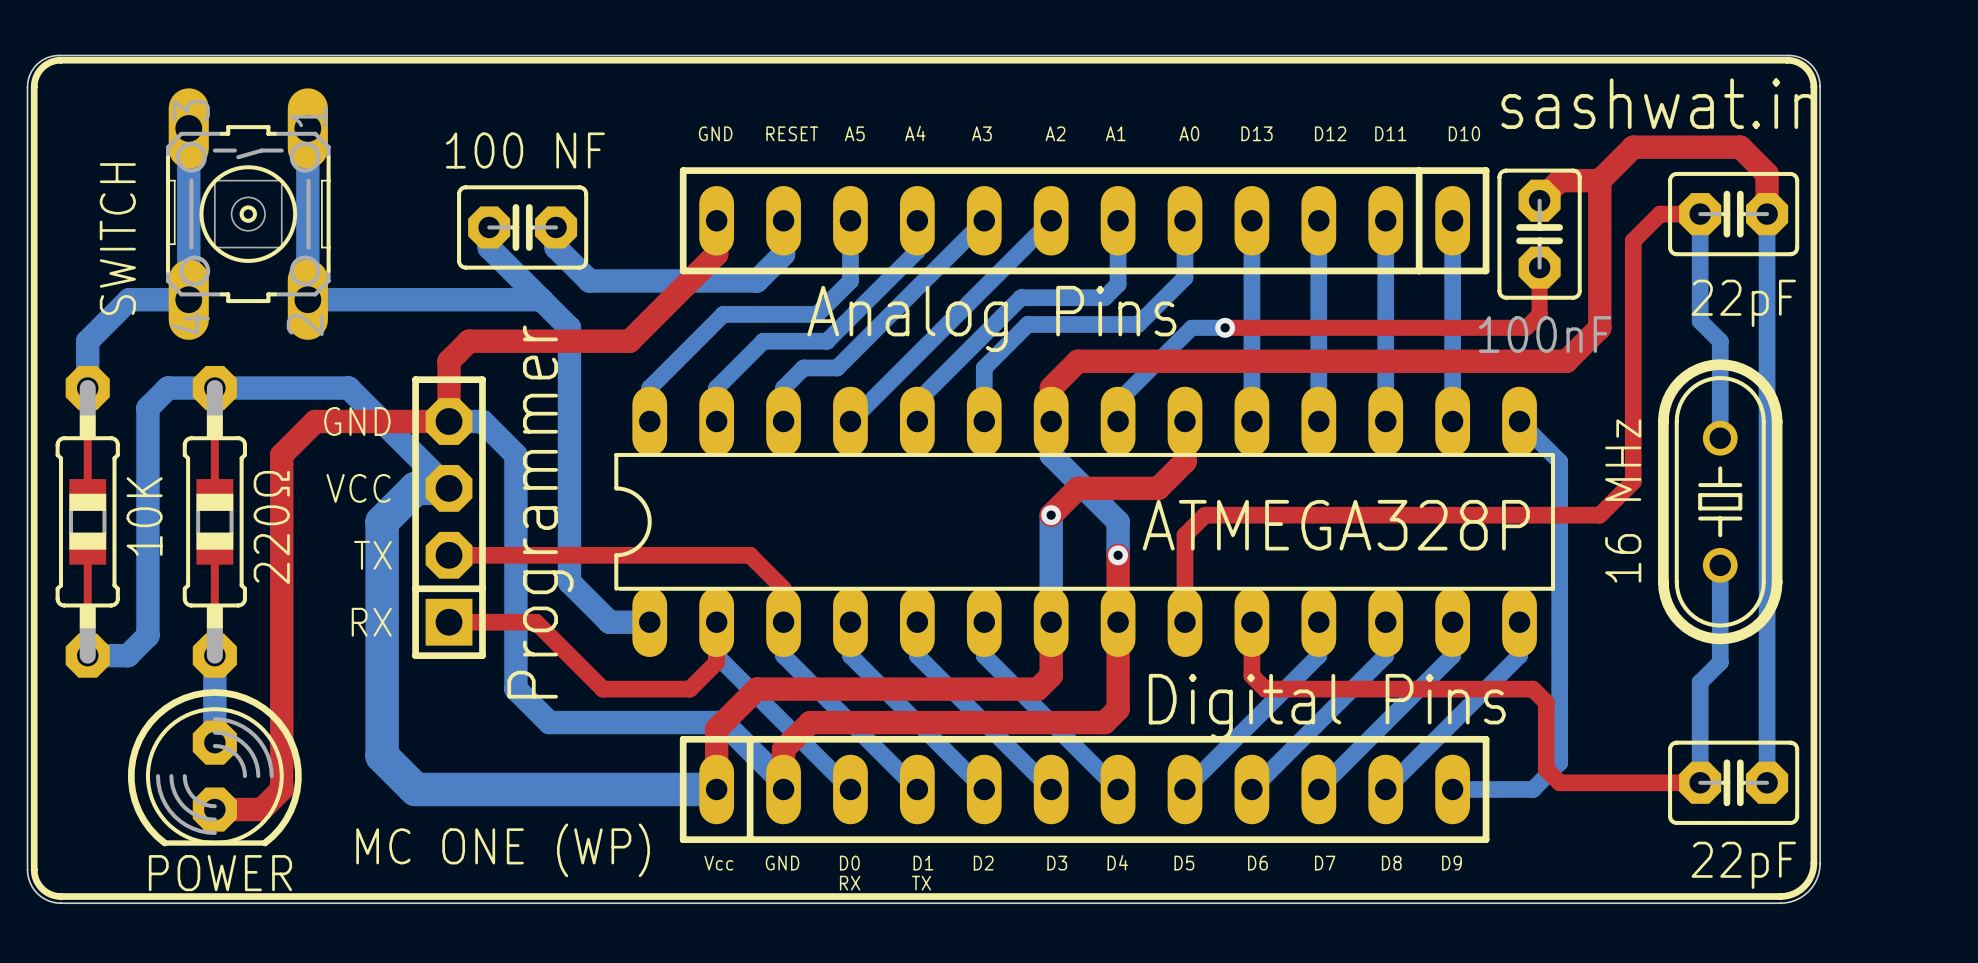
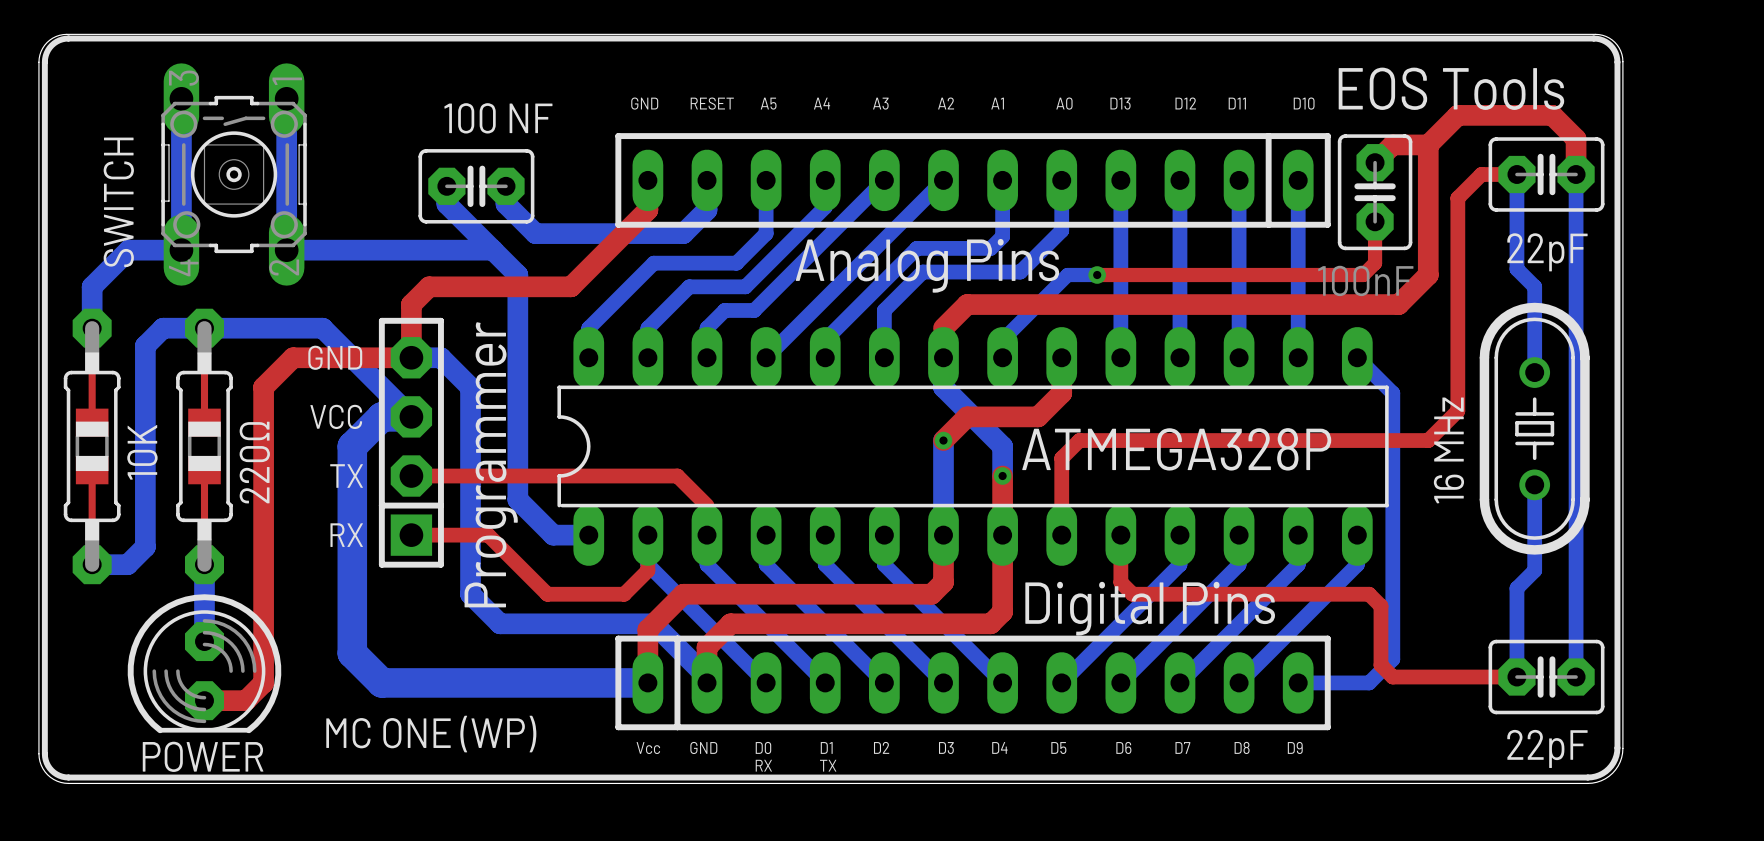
text: sashwat.in (1658, 103) -> EOS Tools (1451, 88)

